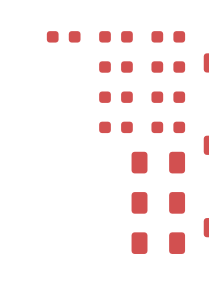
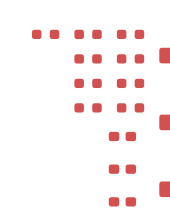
part footprint: [131, 151, 186, 174] -> [108, 131, 137, 142]
part footprint: [131, 192, 186, 214] -> [108, 164, 137, 174]
part footprint: [131, 232, 186, 254] -> [108, 197, 137, 207]

